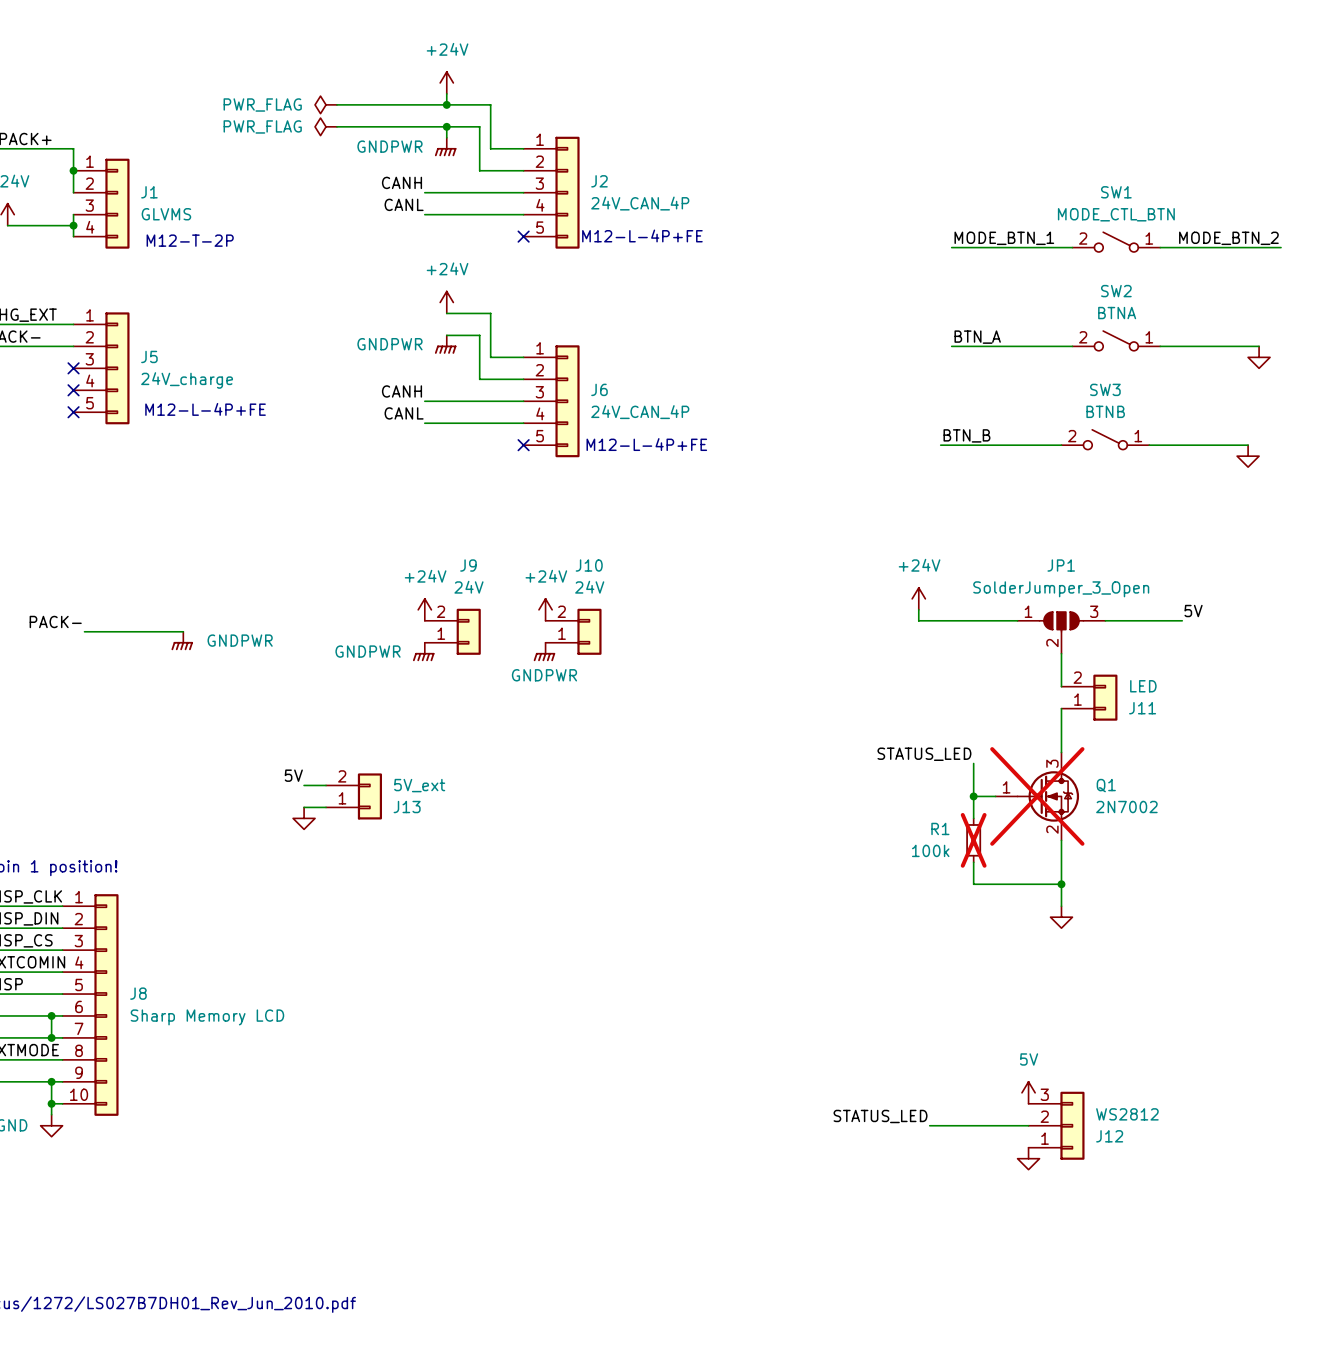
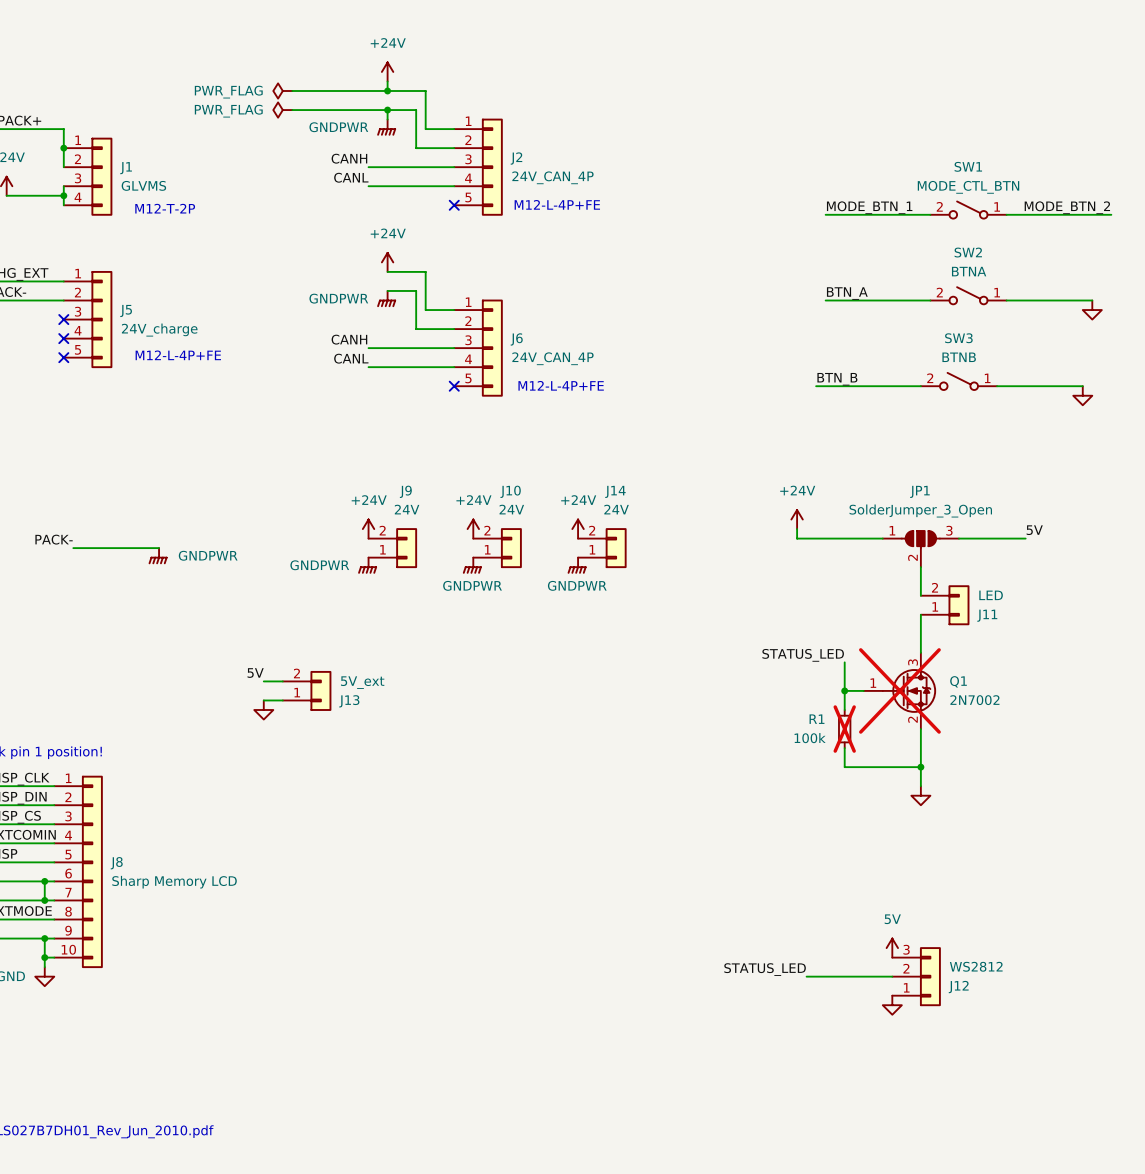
power symbol: none -> +24V (578, 529)
J14: none -> 24V (602, 548)
power symbol: none -> GNDPWR (577, 565)

